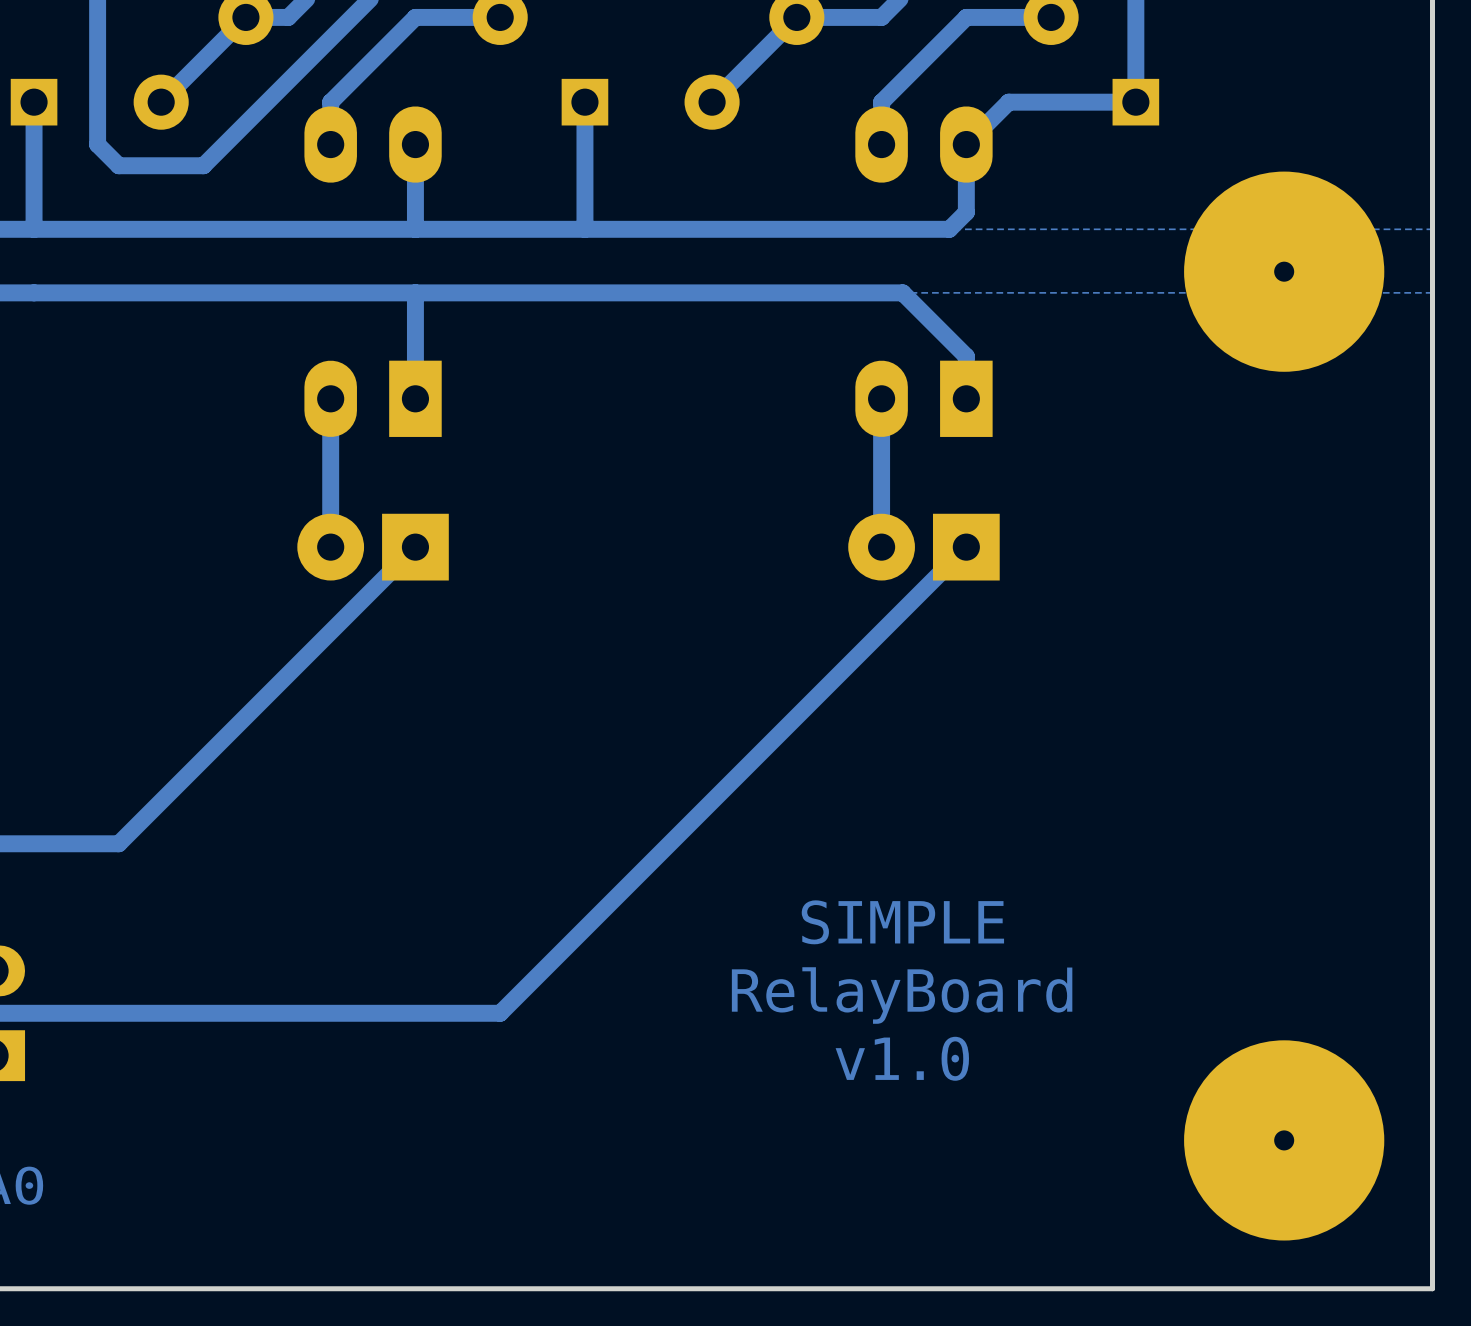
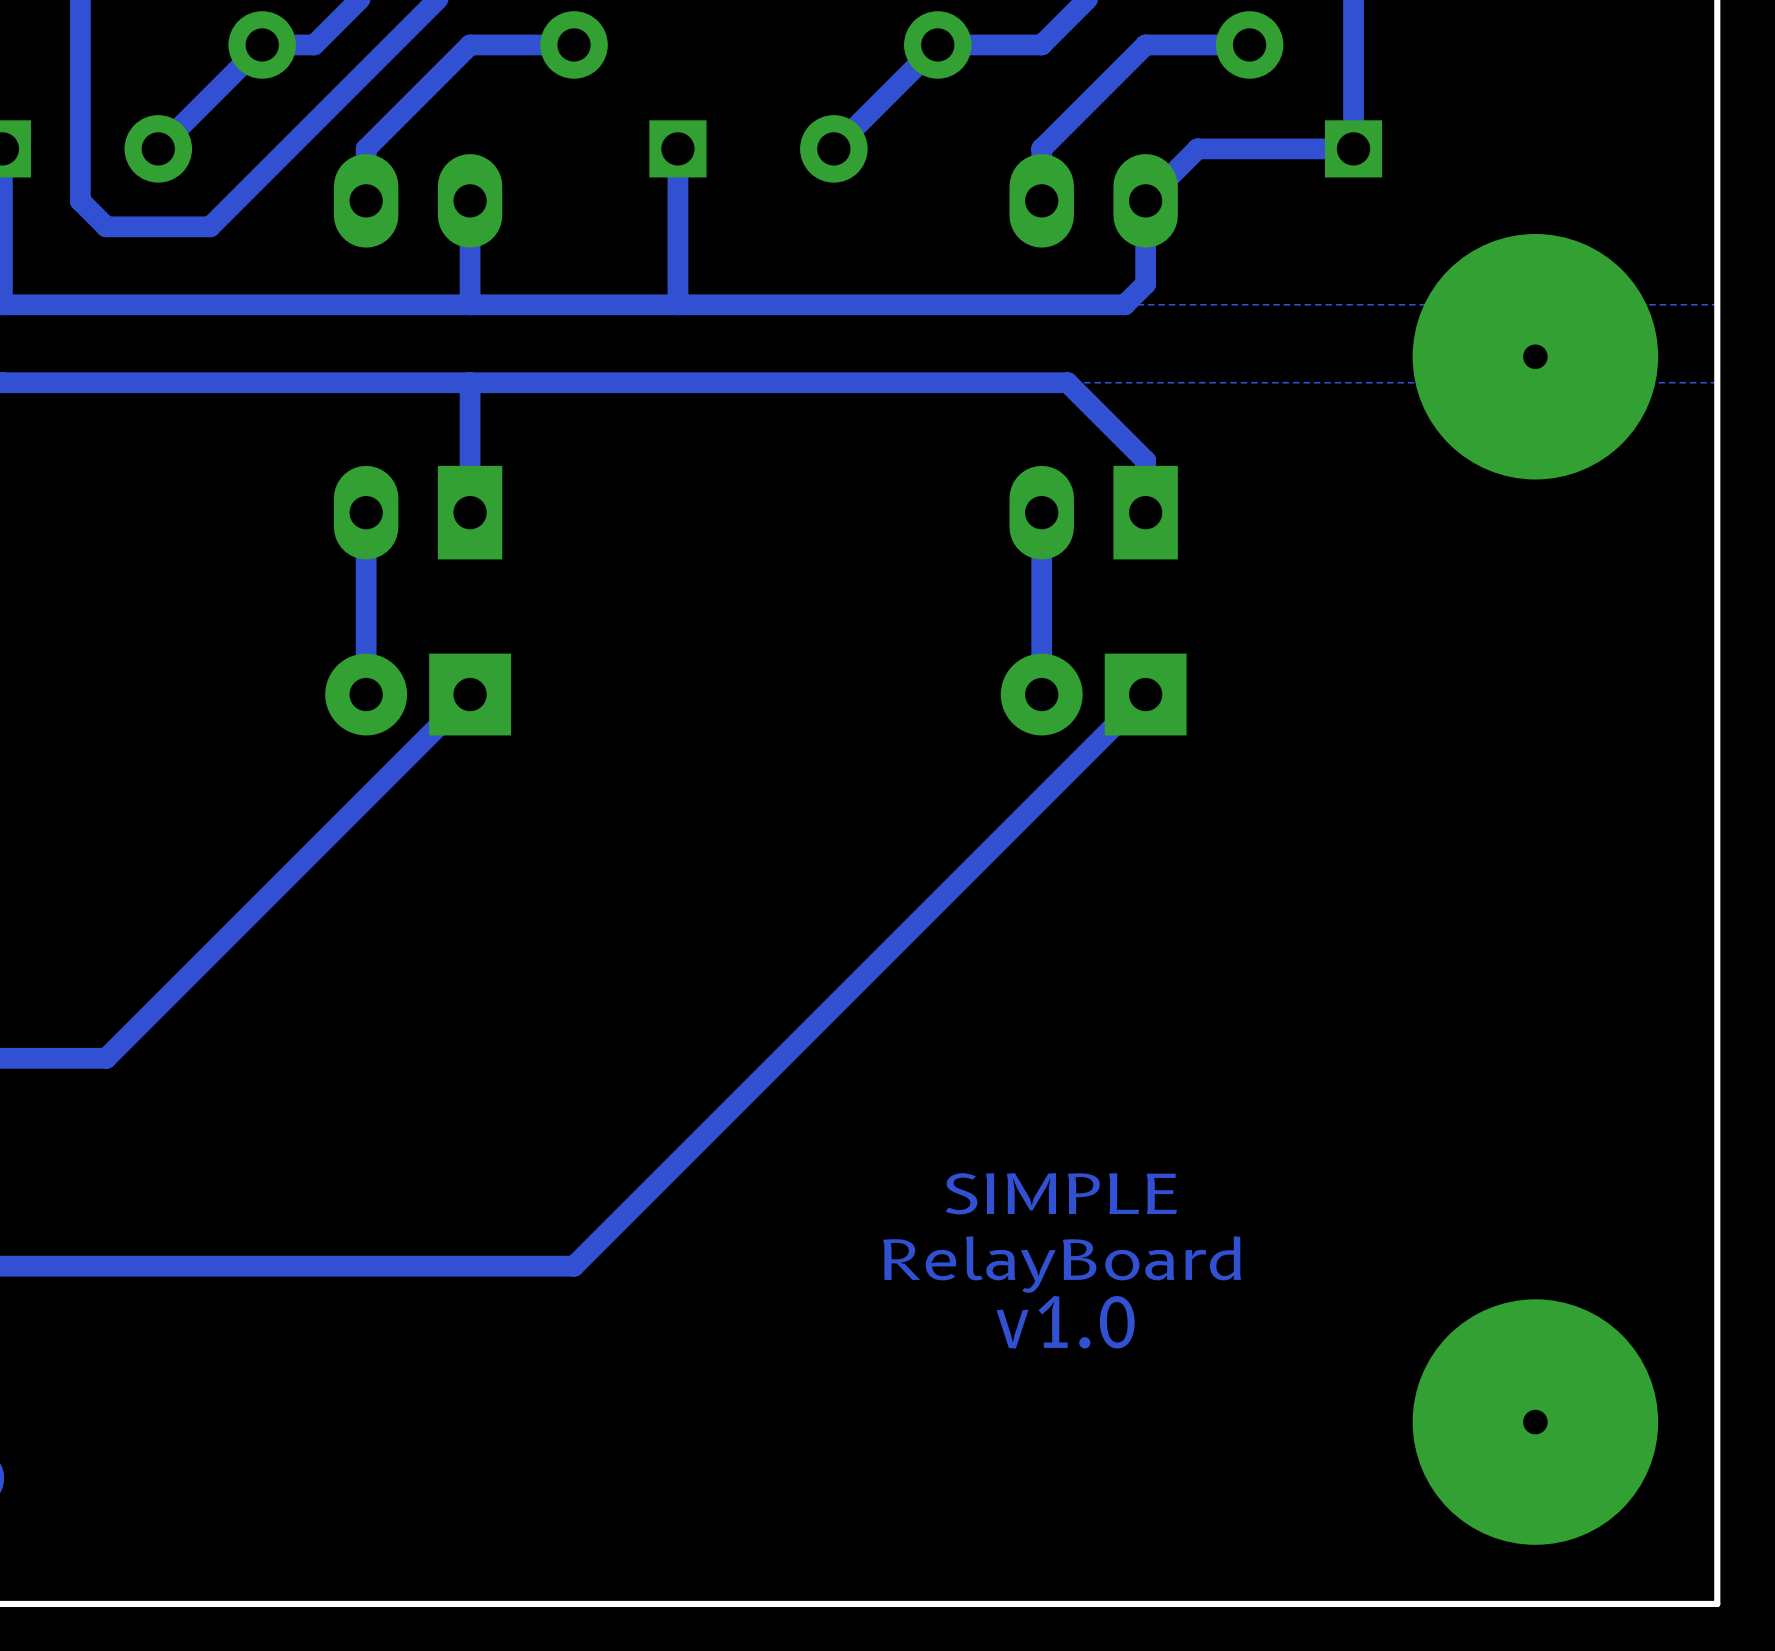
text position: SIMPLE (902, 922) -> SIMPLE (1061, 1193)
text position: RelayBoard (902, 995) -> RelayBoard (1062, 1264)

